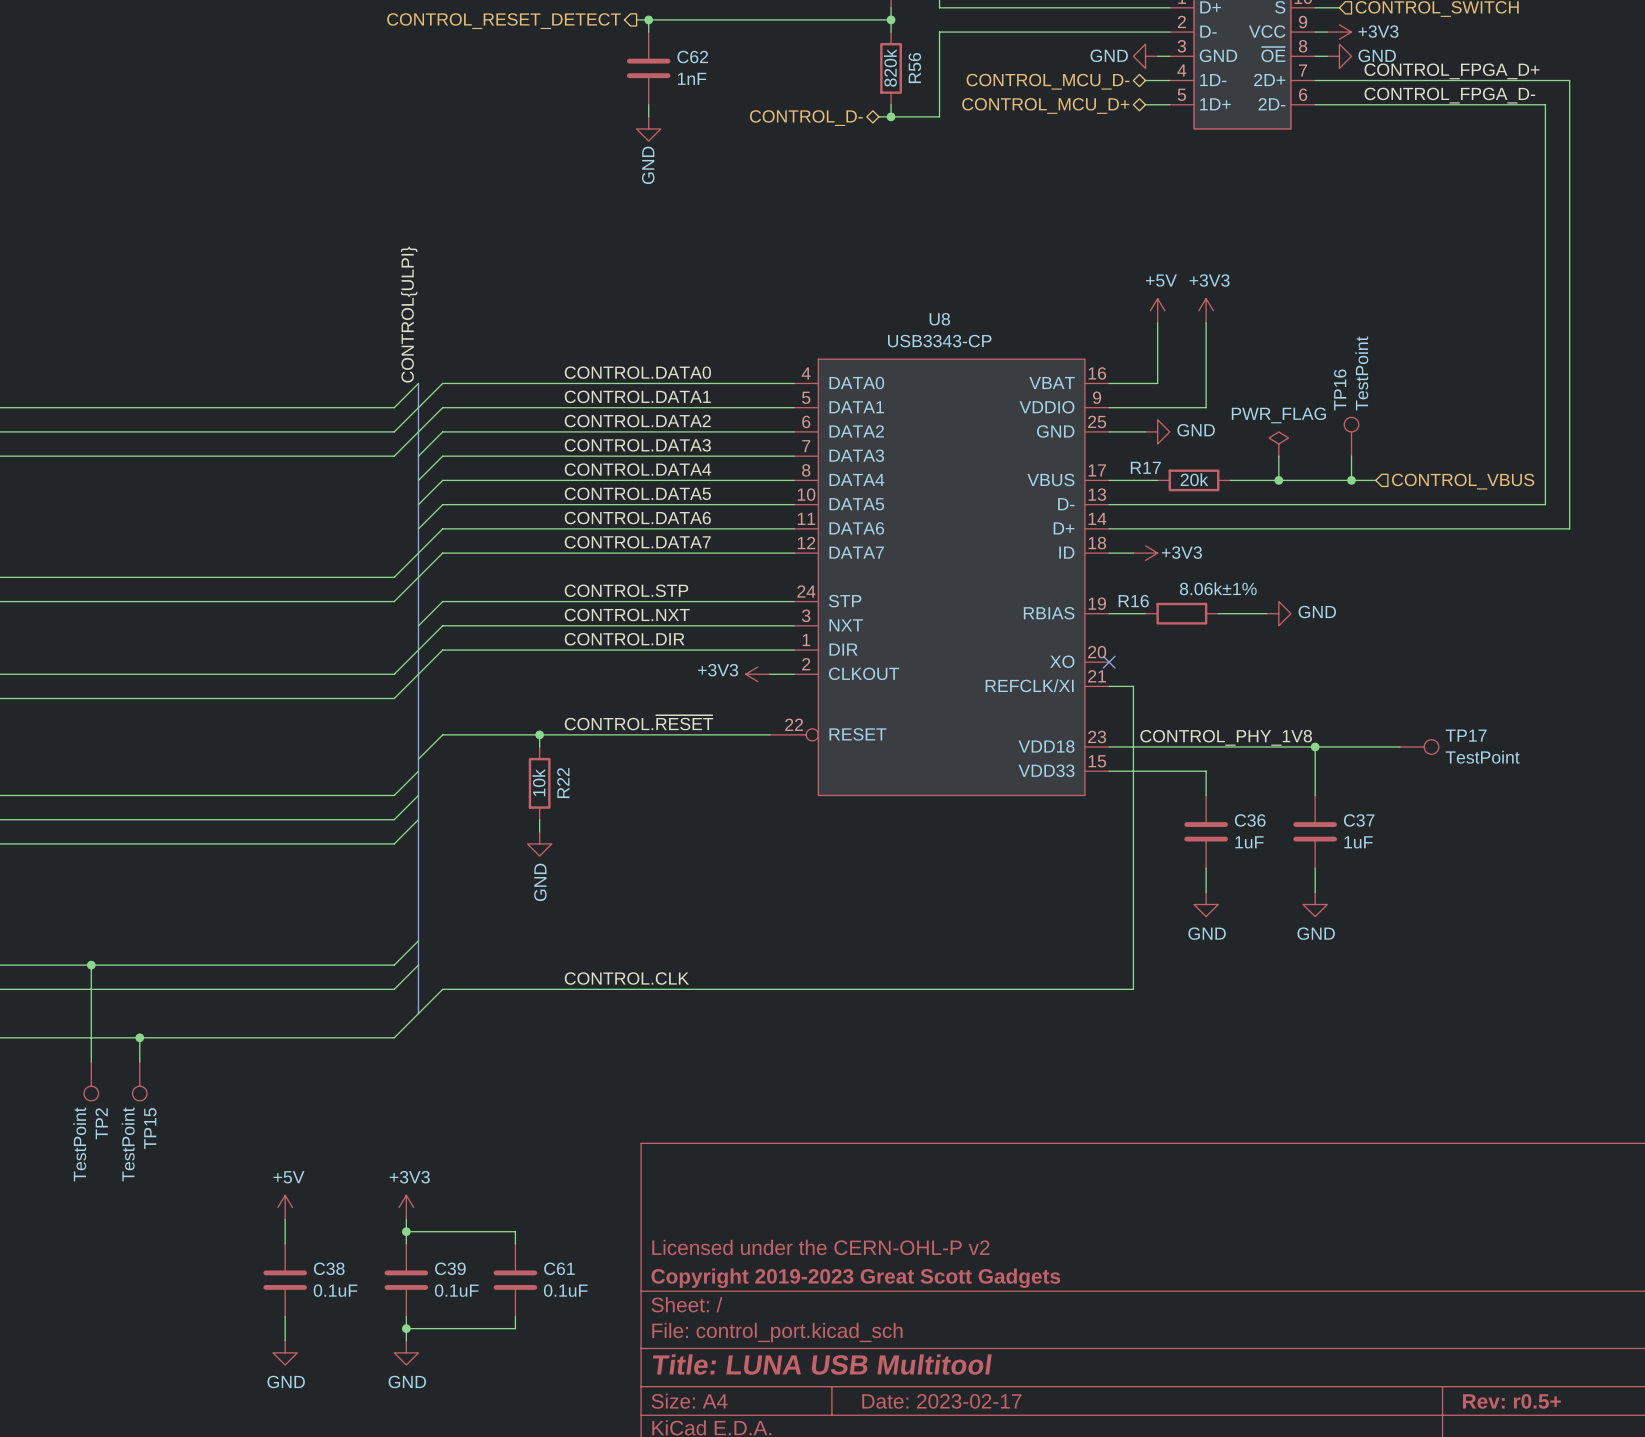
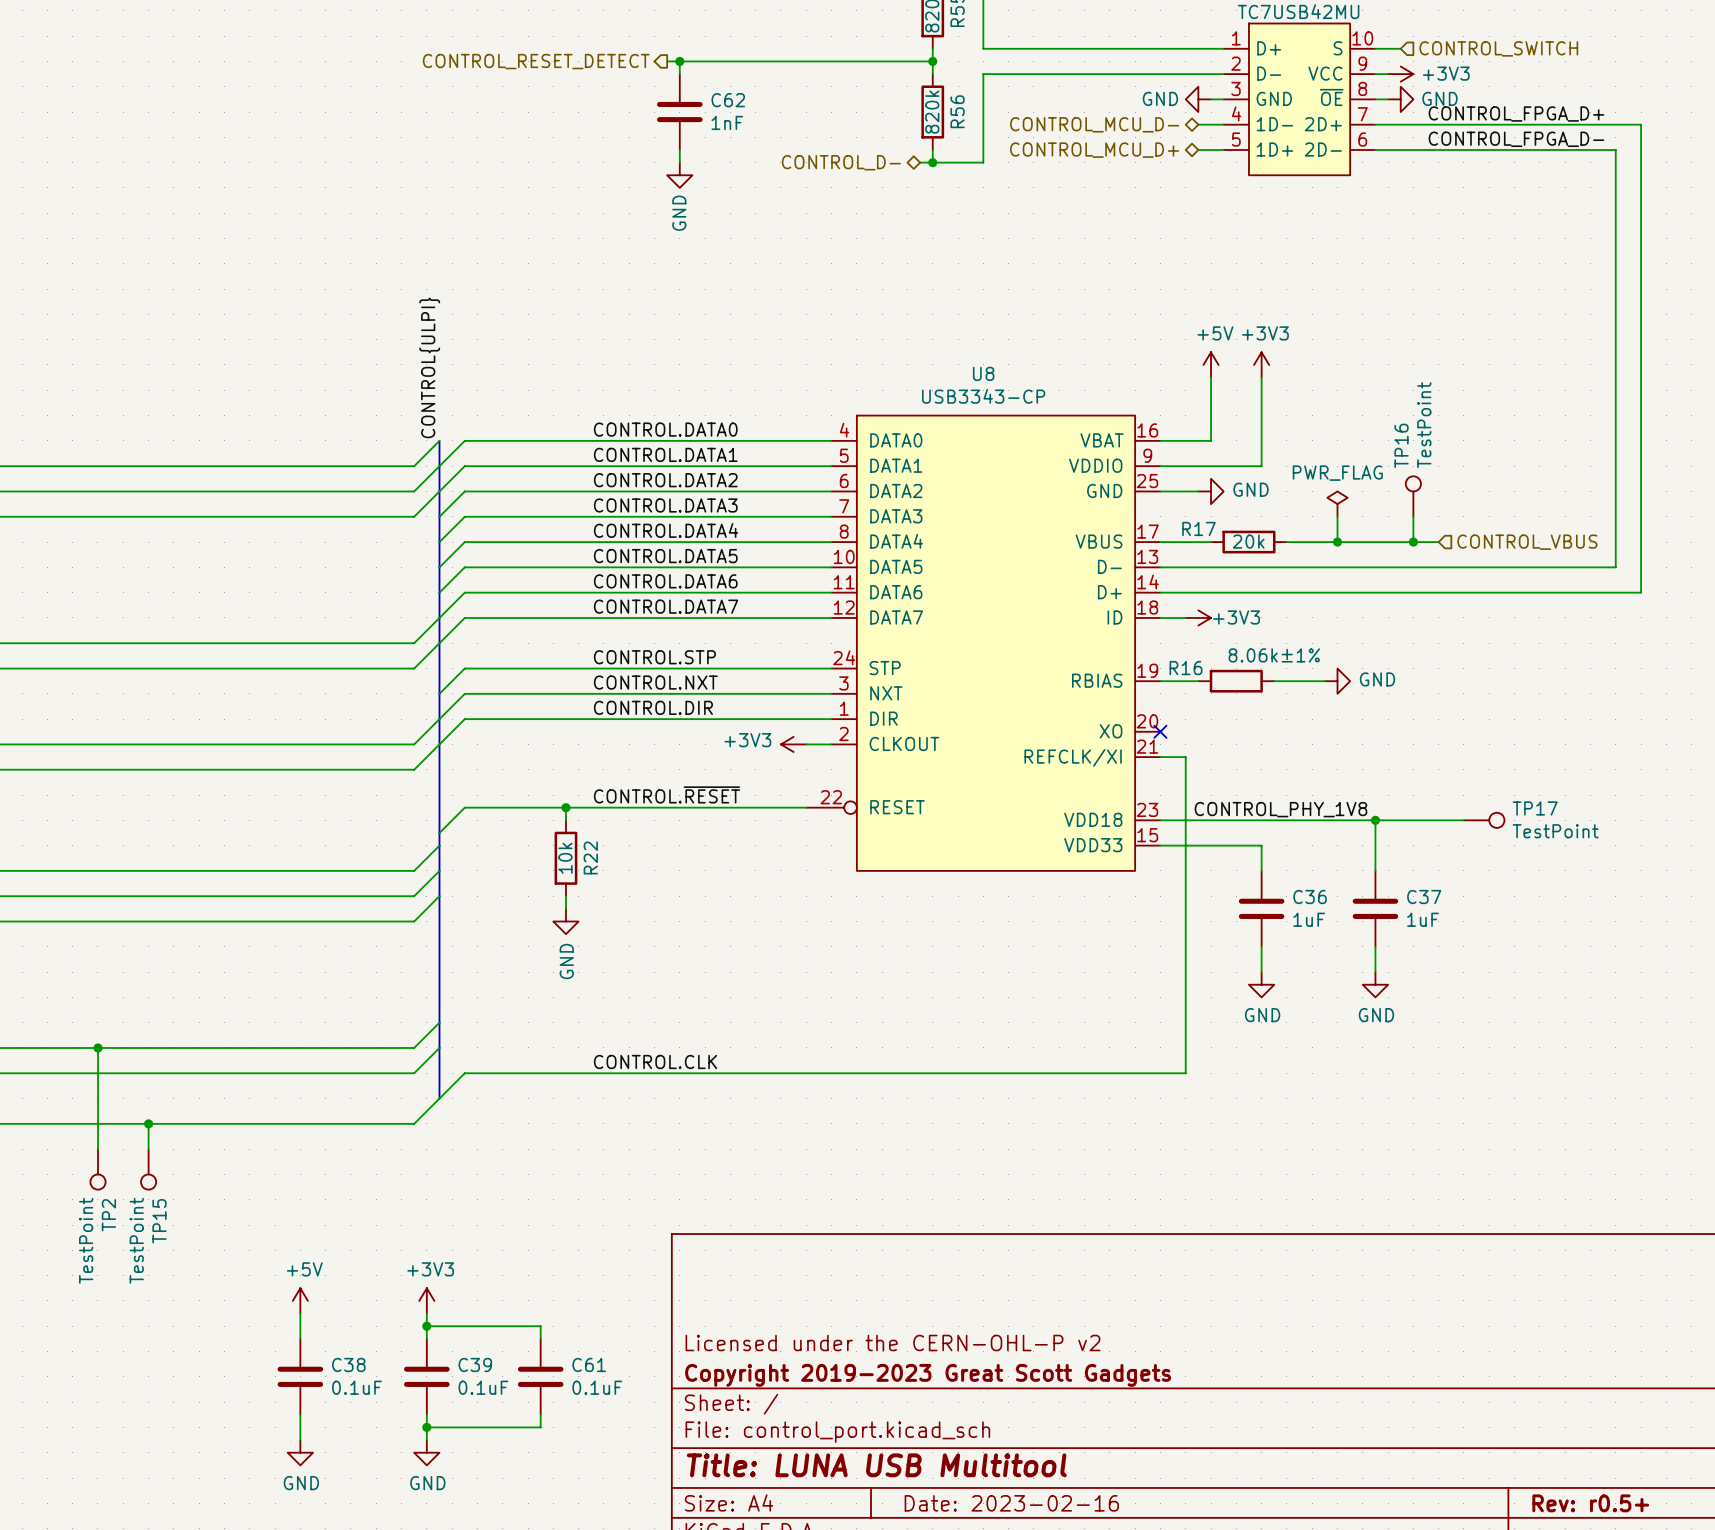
title block: Date: 2023-02-17 (941, 1401) -> Date: 2023-02-16 (1011, 1503)

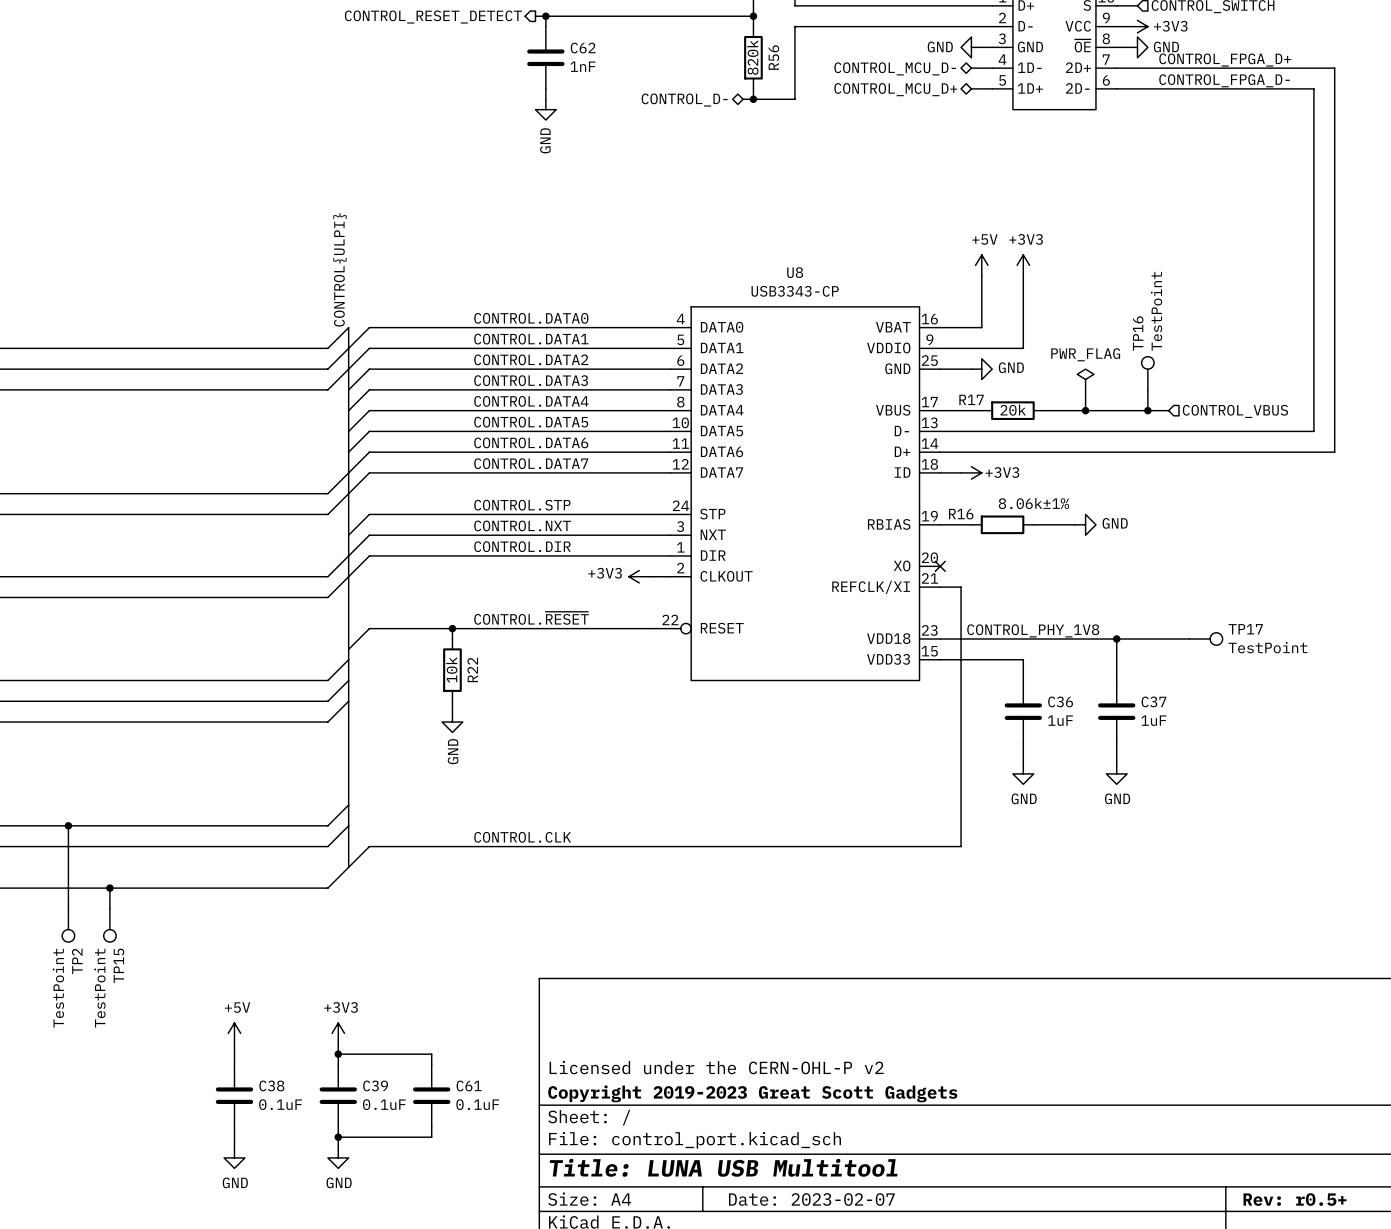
title block: Date: 2023-02-16 (1011, 1503) -> Date: 2023-02-07 (811, 1199)

